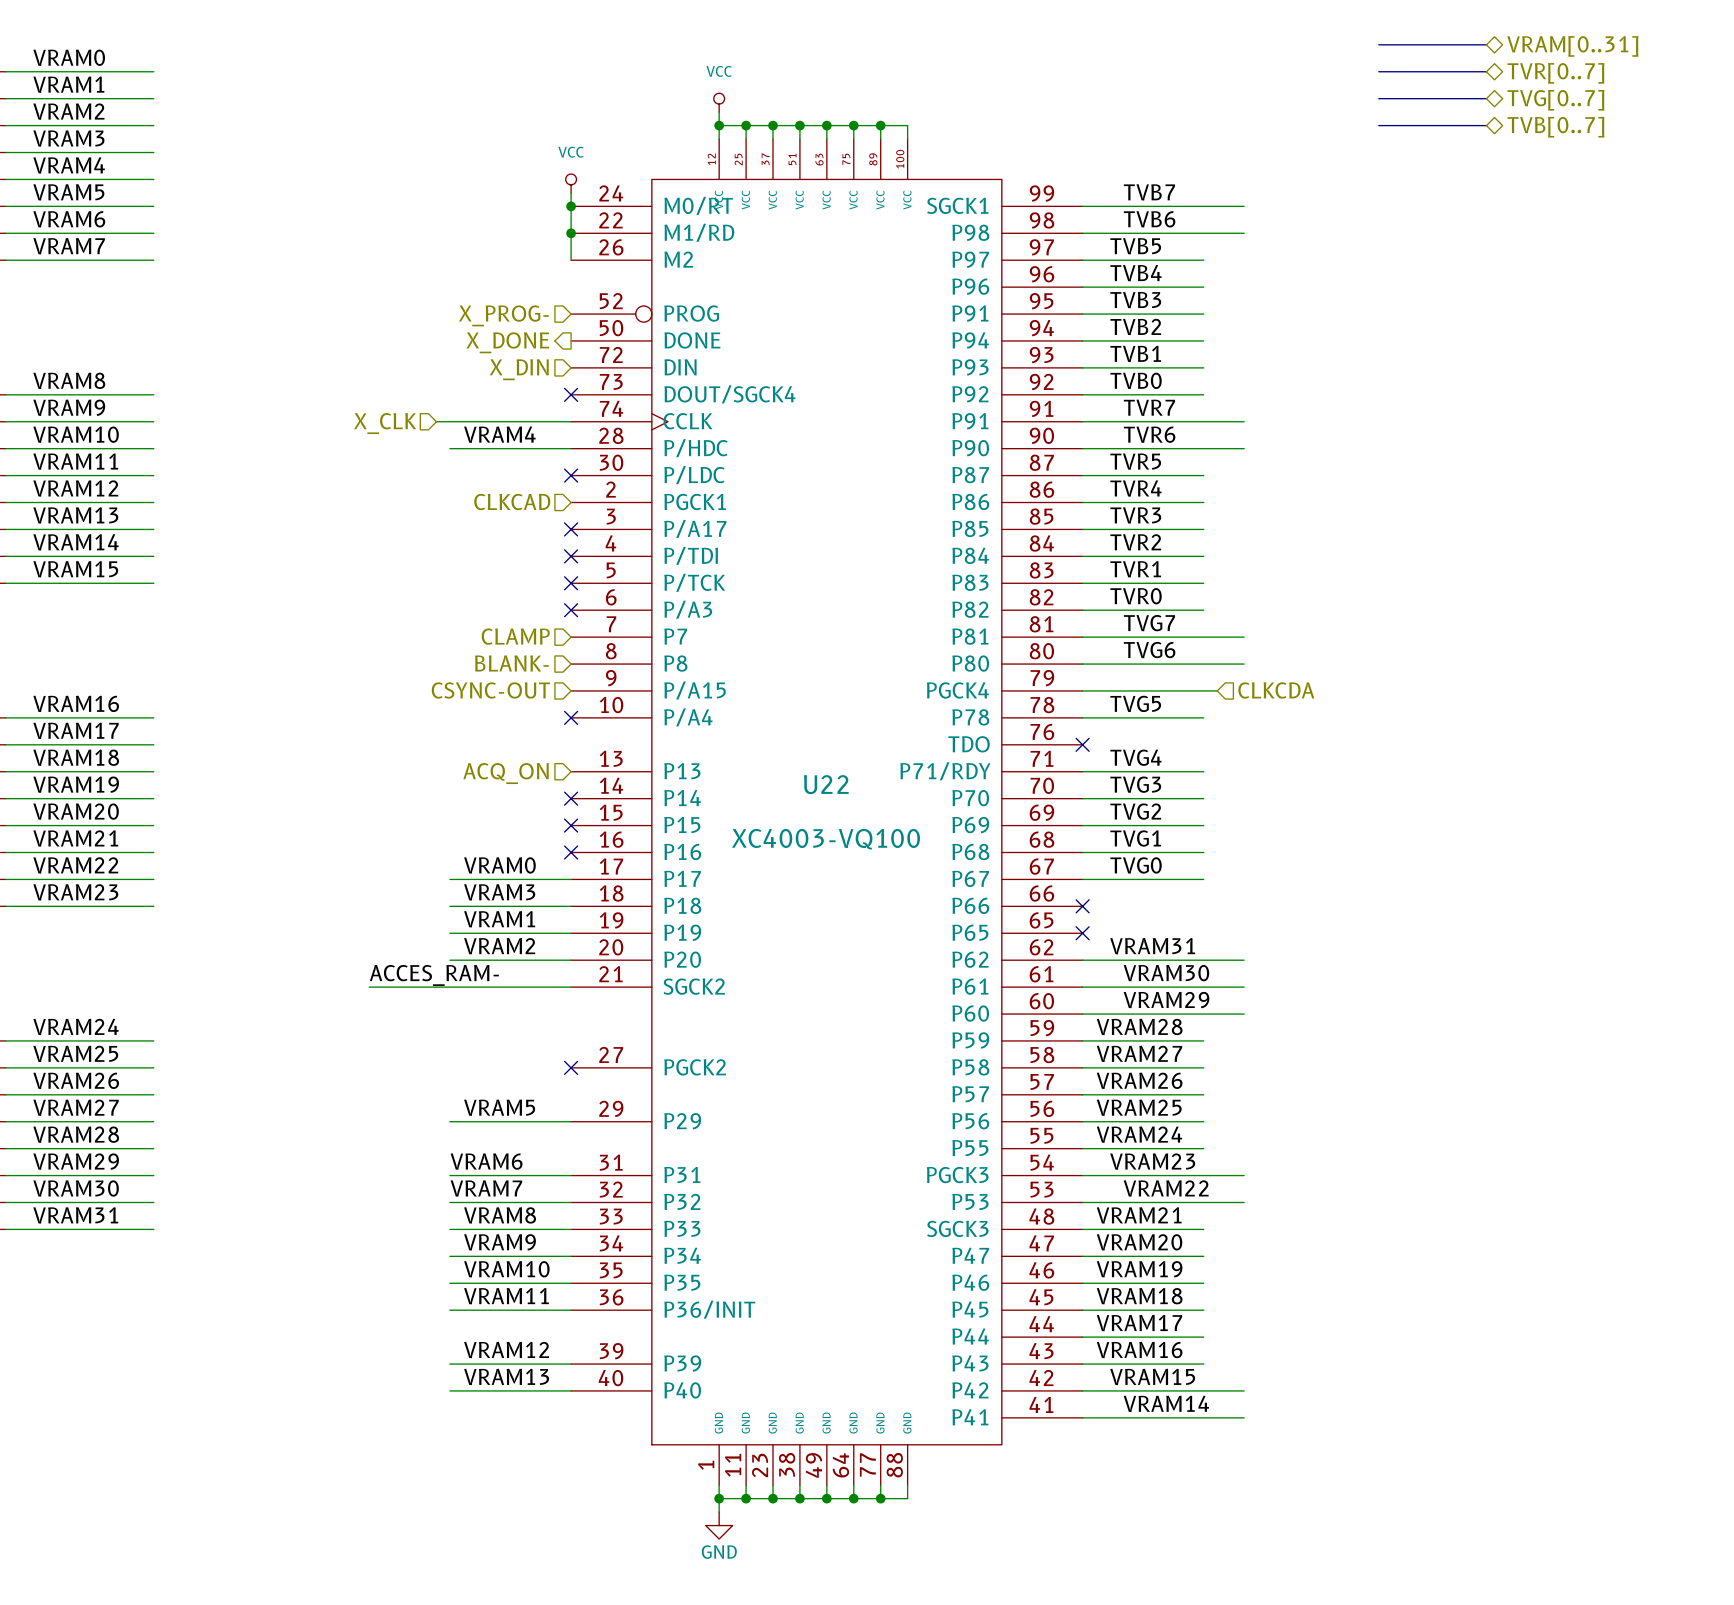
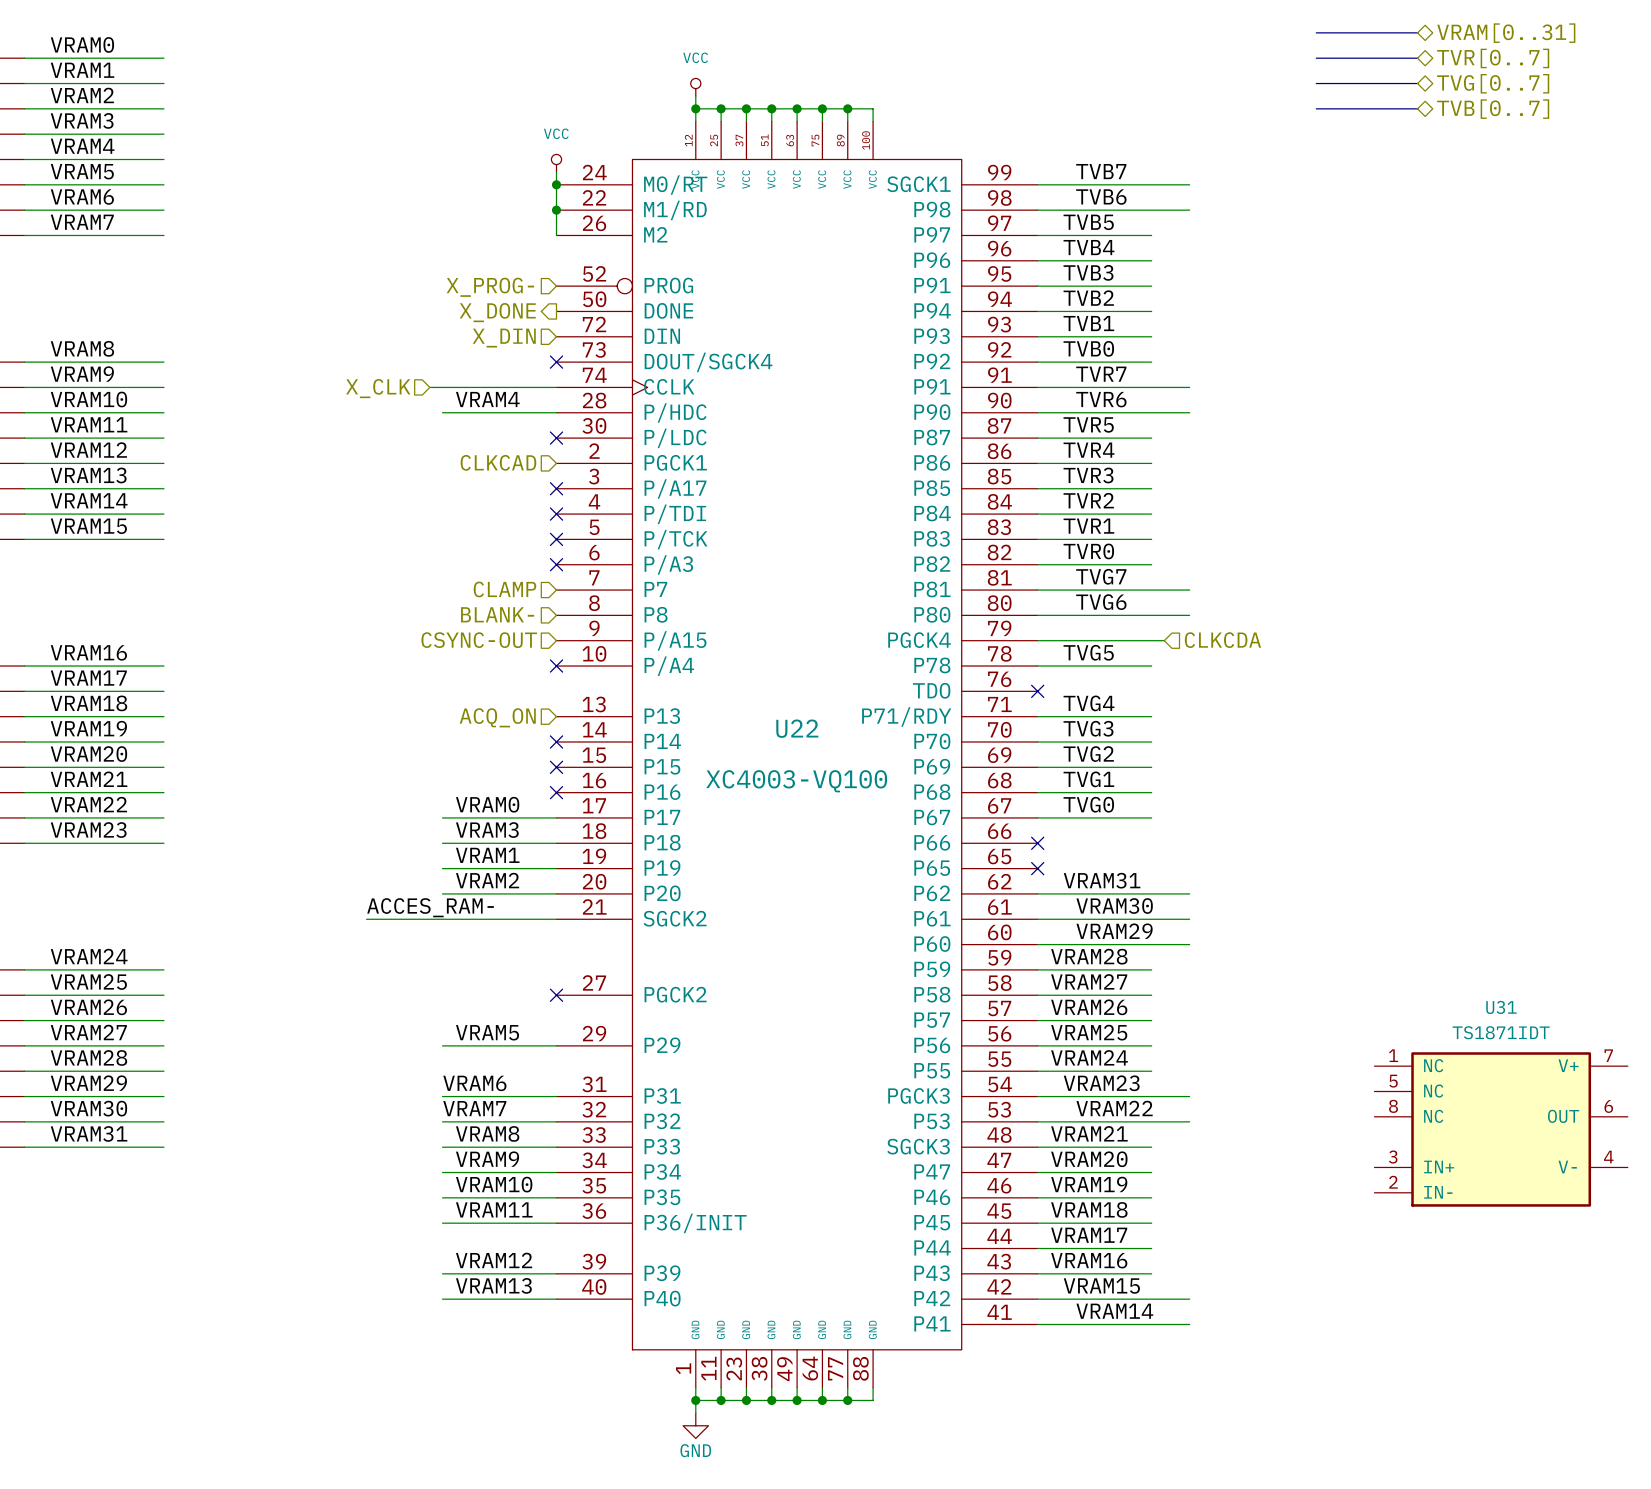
U31: none -> TS1871IDT (1501, 1129)

